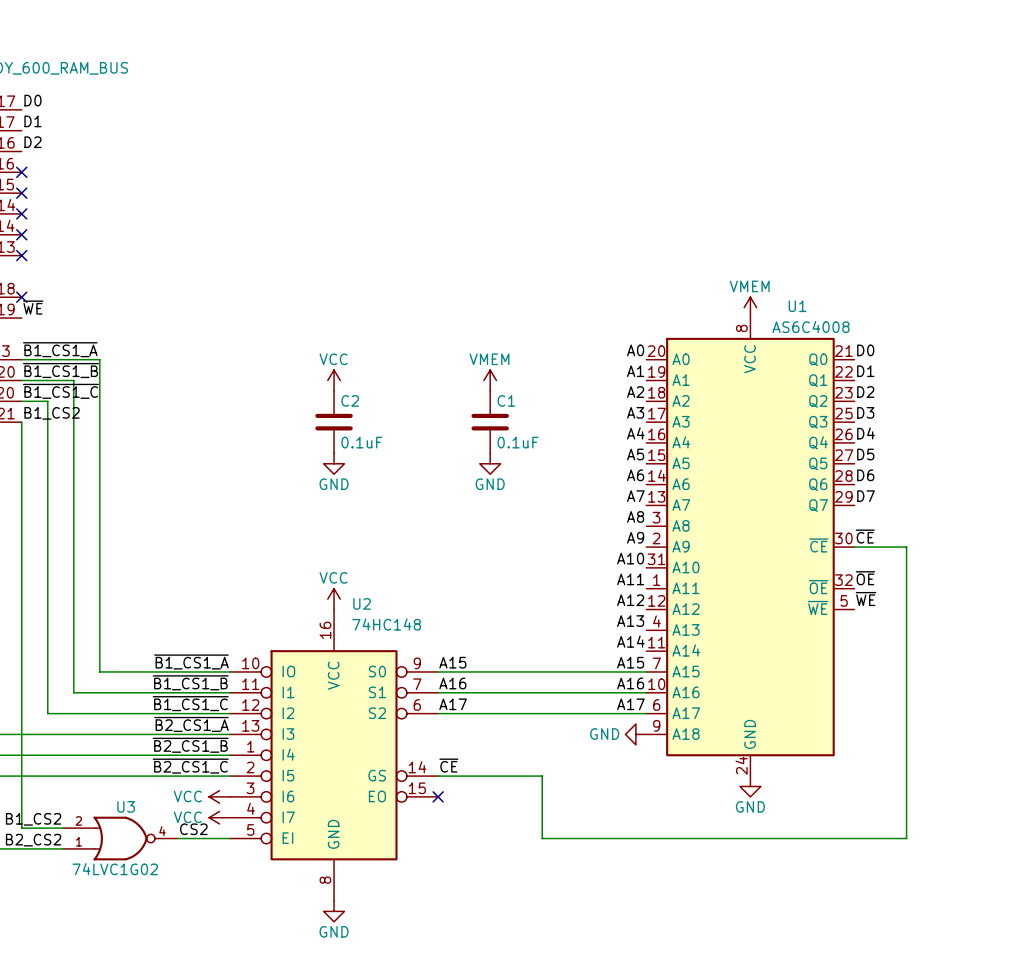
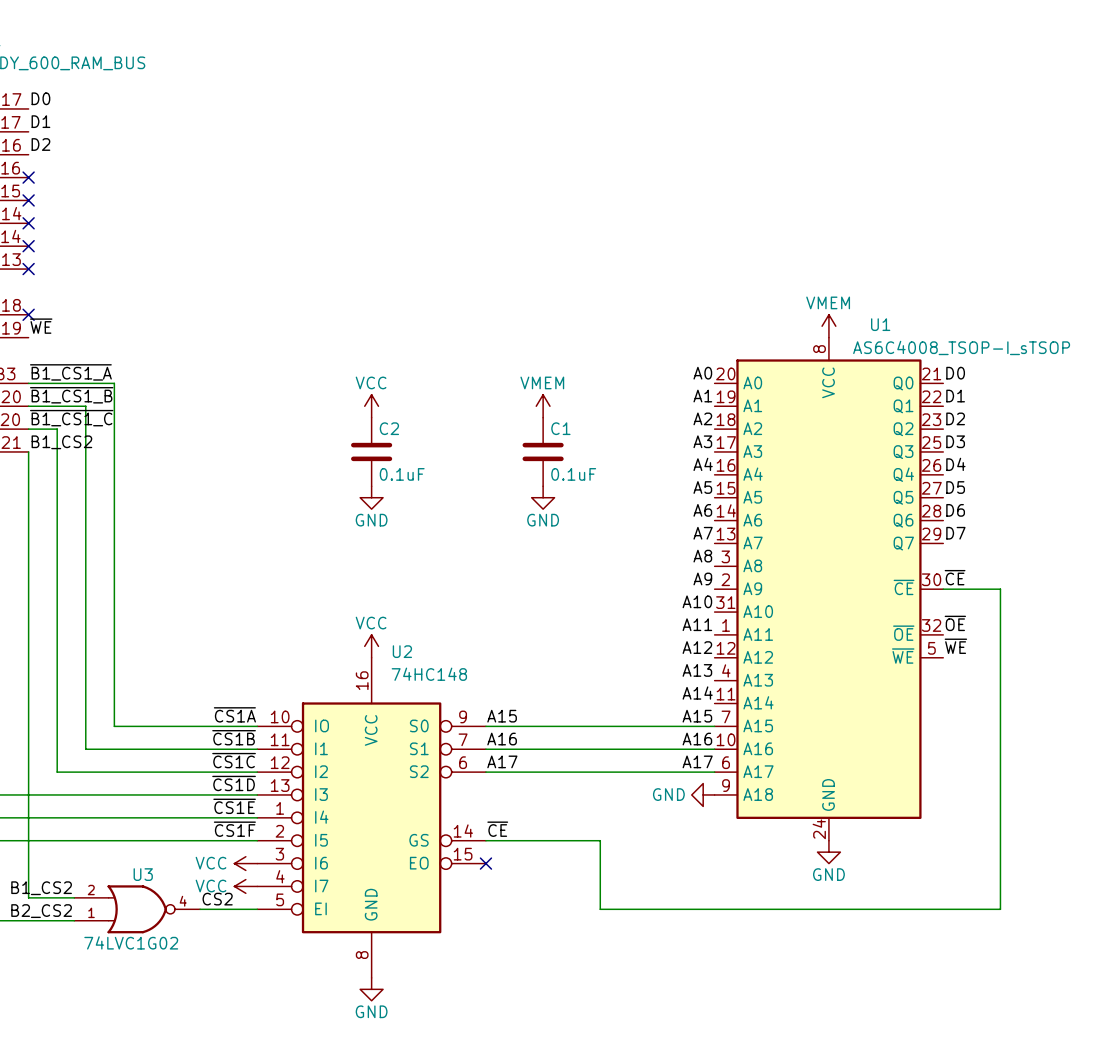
U1 value: AS6C4008 (810, 326) -> AS6C4008_TSOP-I_sTSOP (961, 347)
label: ~{B1_CS1_A} (191, 661) -> ~{CS1A} (234, 714)
label: ~{B1_CS1_B} (190, 682) -> ~{CS1B} (234, 737)
label: ~{B1_CS1_C} (190, 703) -> ~{CS1C} (234, 760)
label: ~{B2_CS1_A} (191, 724) -> ~{CS1D} (234, 783)
label: ~{B2_CS1_B} (190, 745) -> ~{CS1E} (234, 806)
label: ~{B2_CS1_C} (190, 766) -> ~{CS1F} (234, 829)

